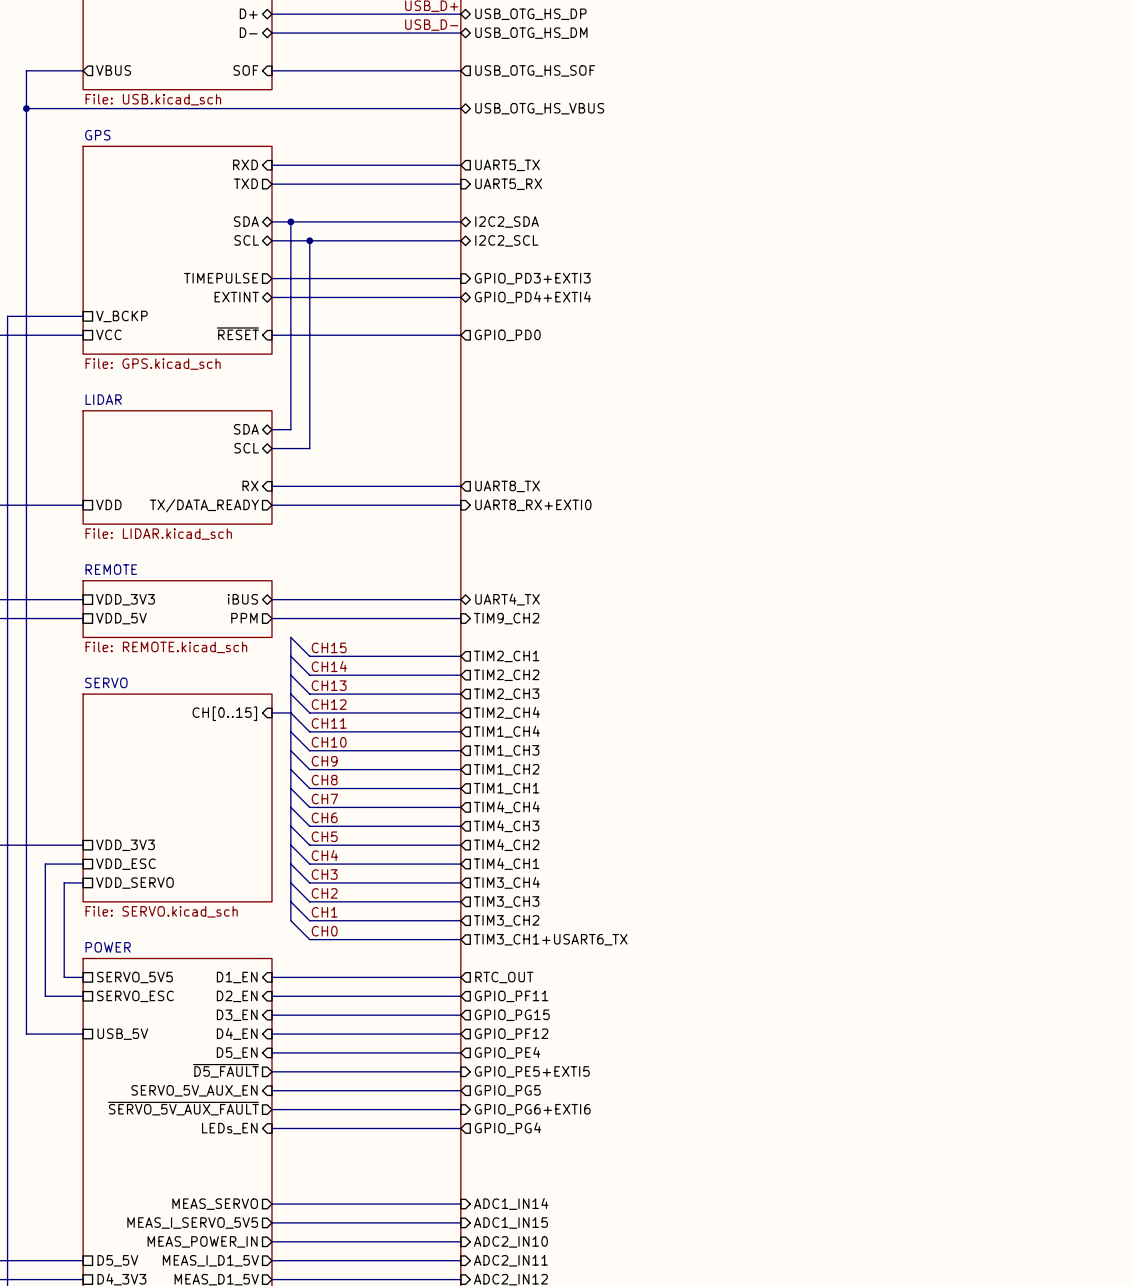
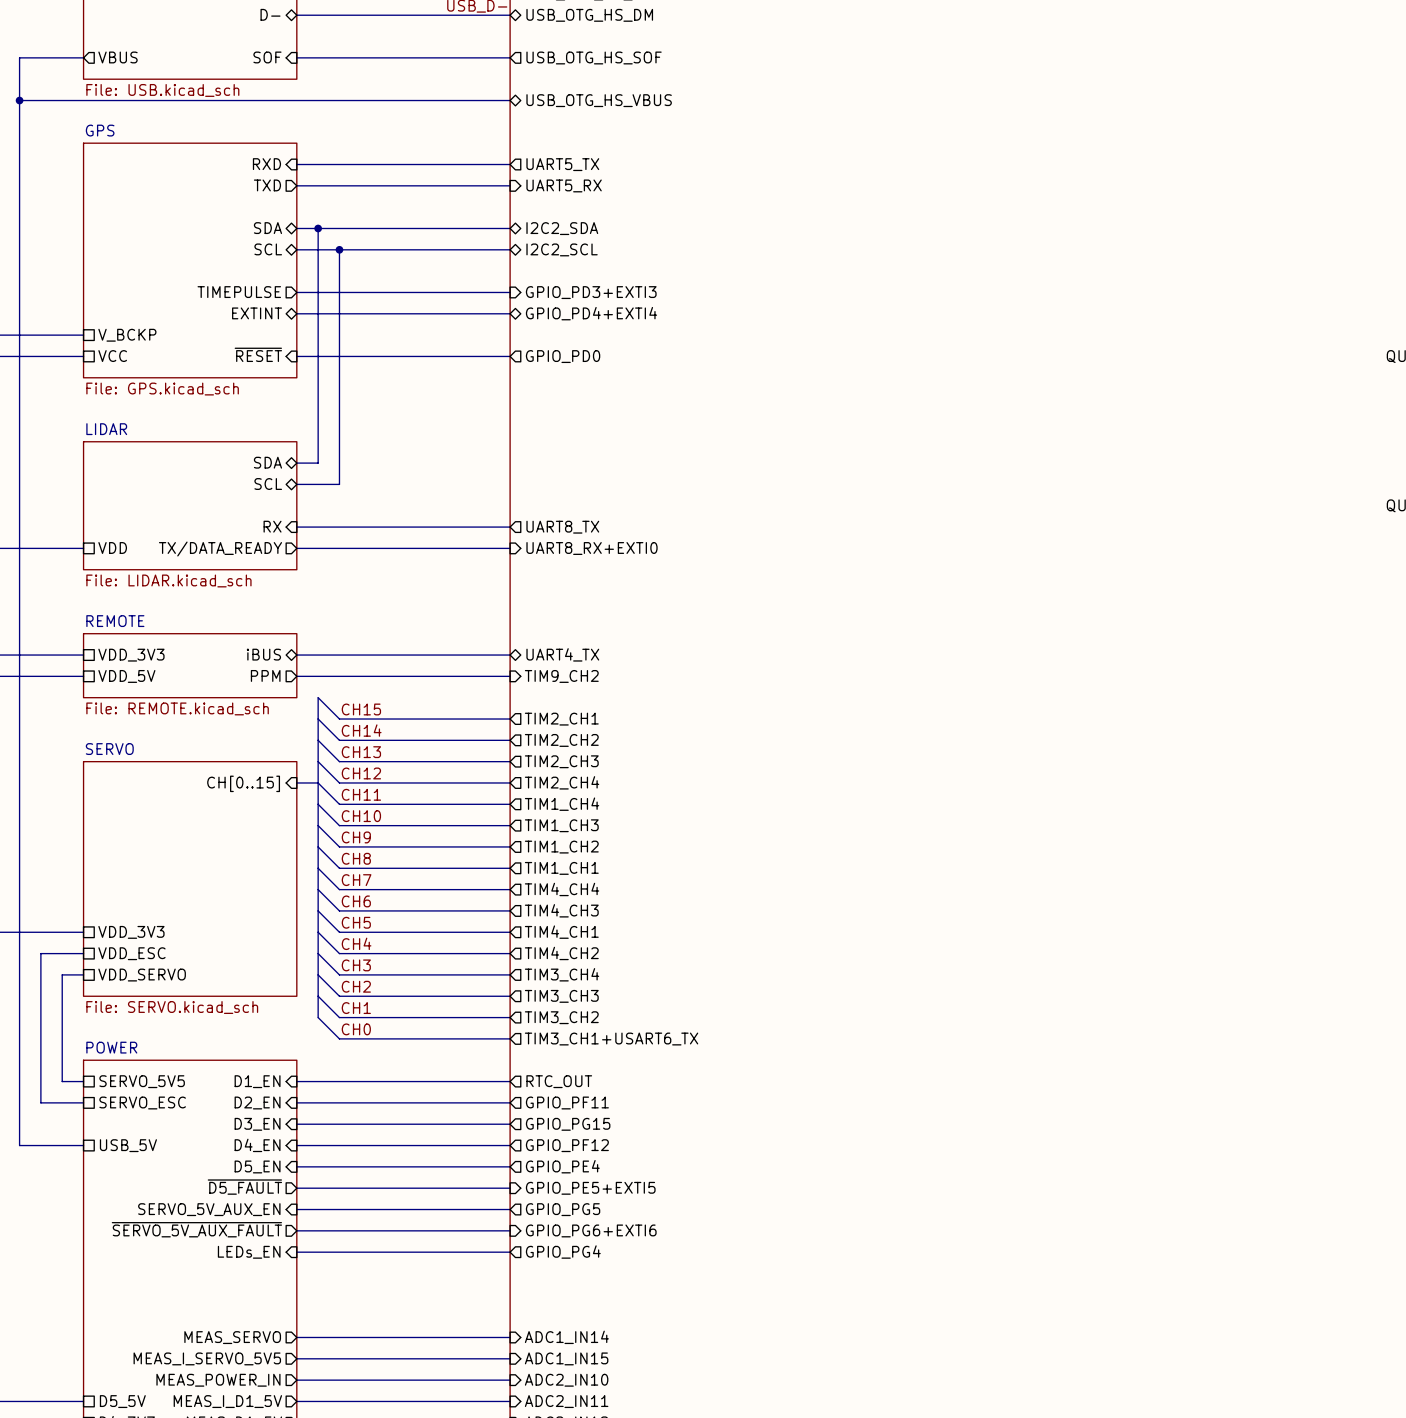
sheet pin: TIM4_CH2 (506, 845) -> TIM4_CH1 (561, 932)
sheet pin: TIM4_CH1 (506, 863) -> TIM4_CH2 (561, 953)

